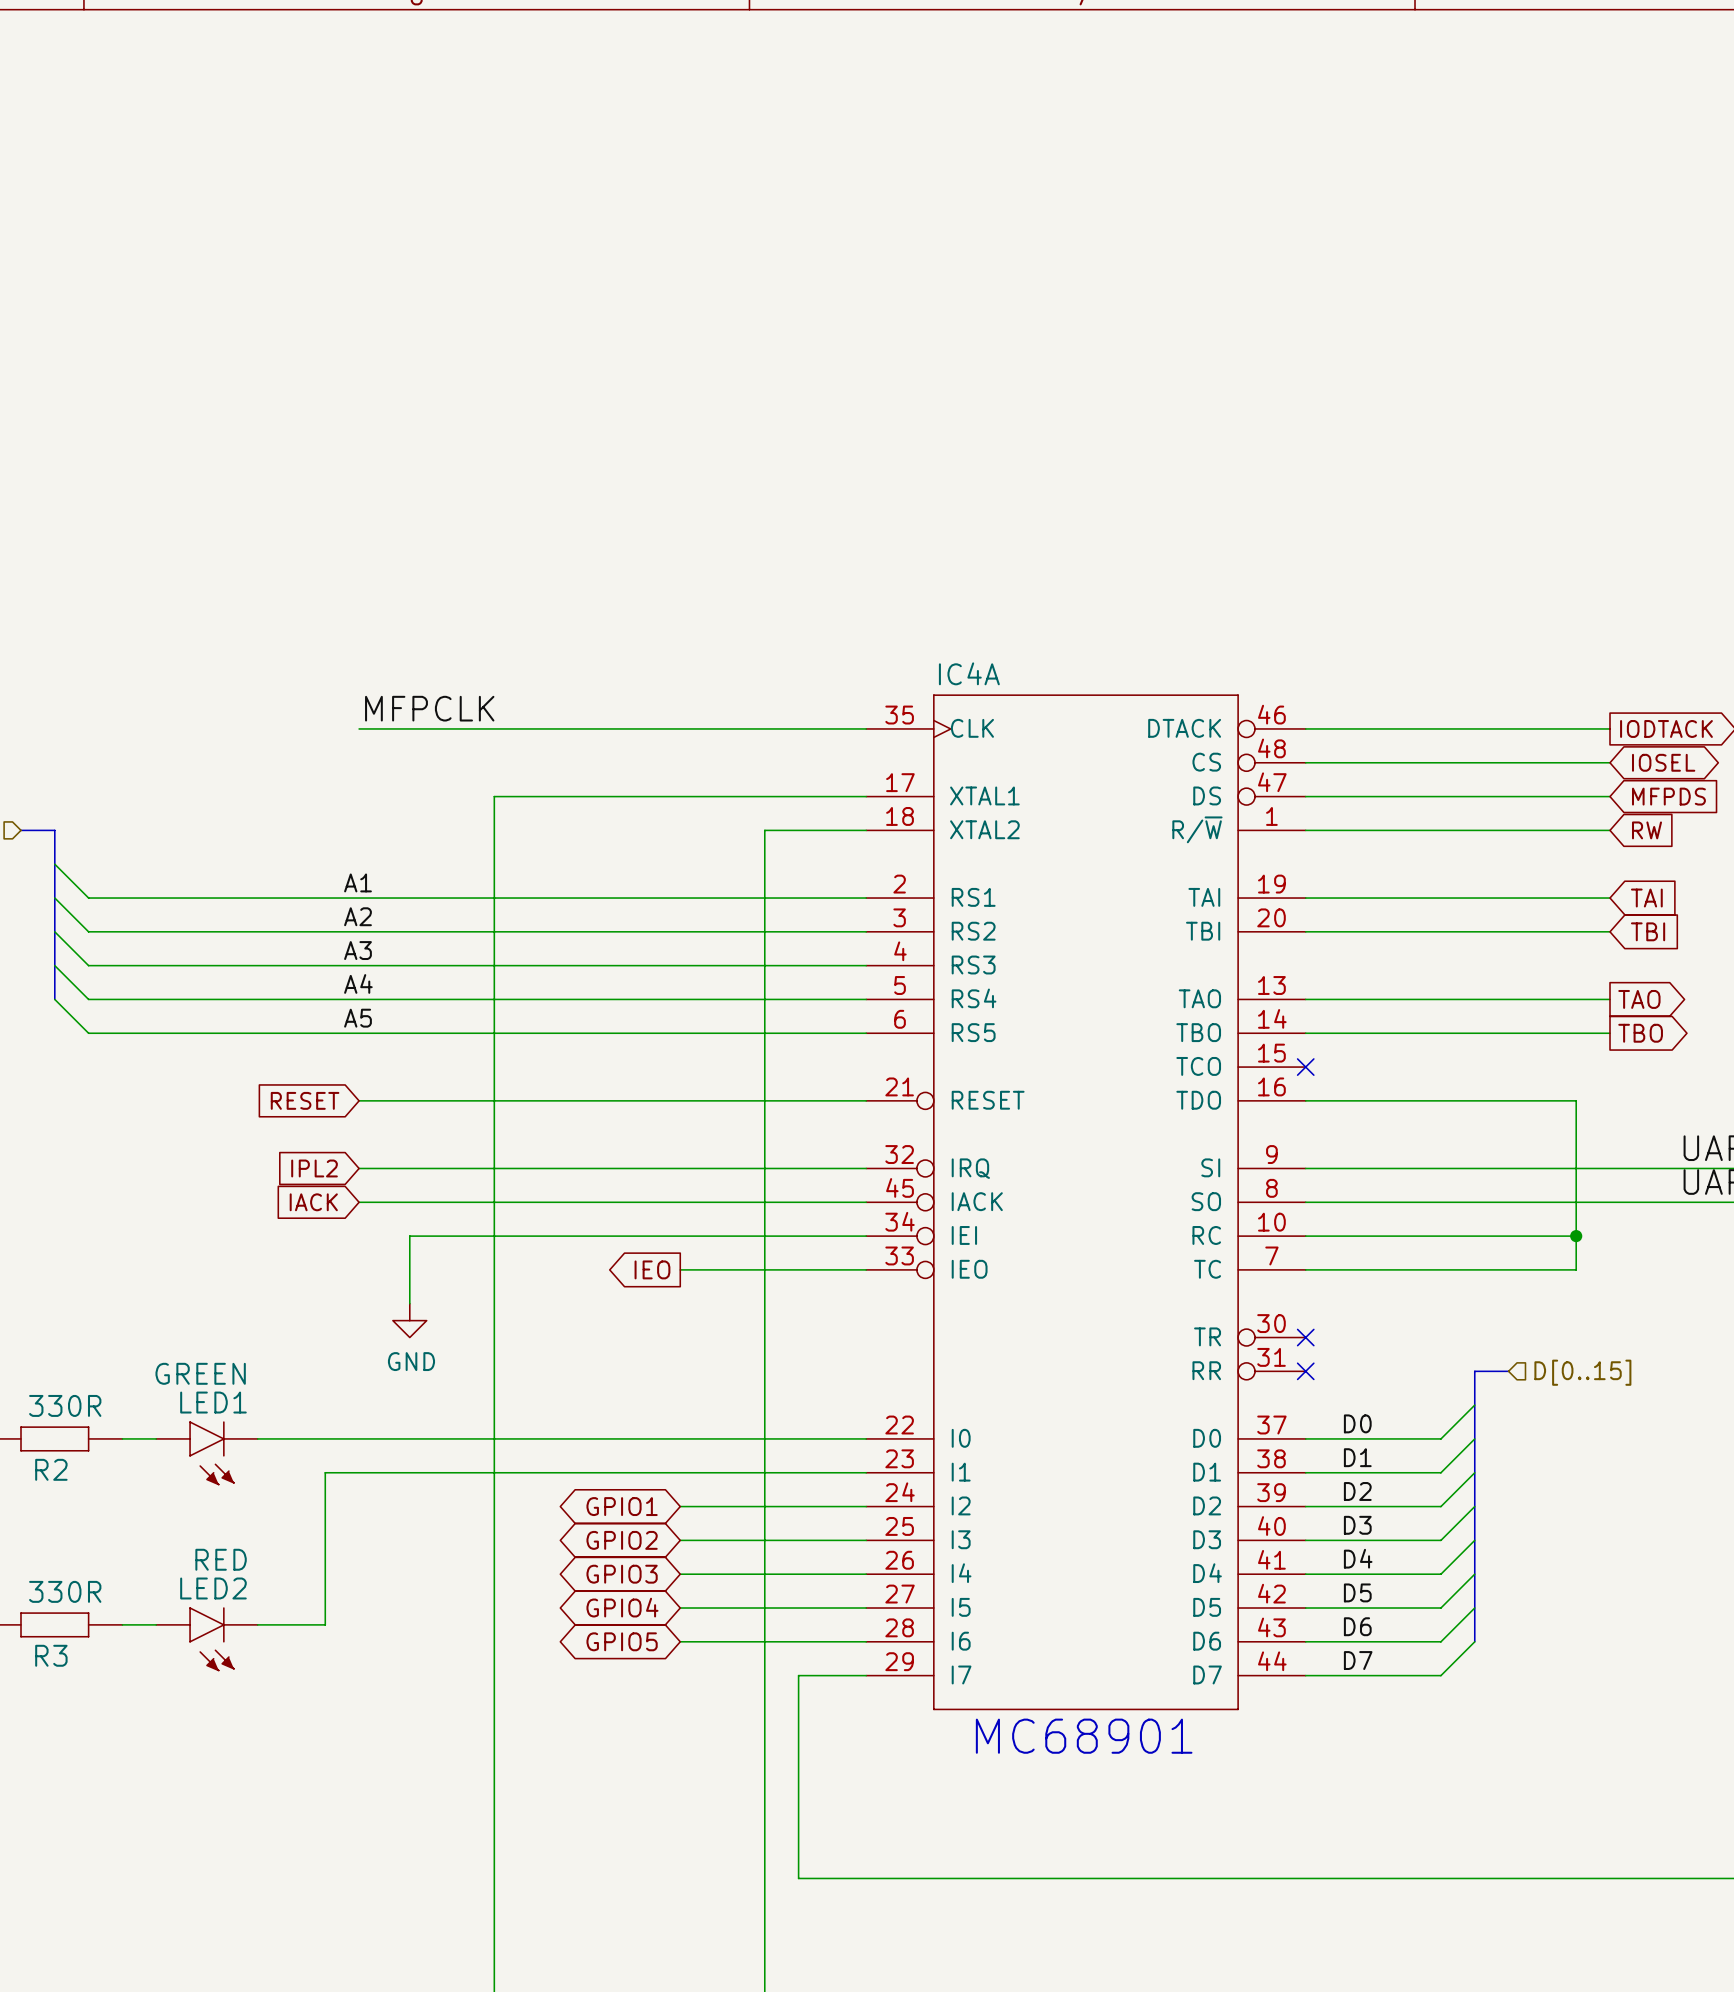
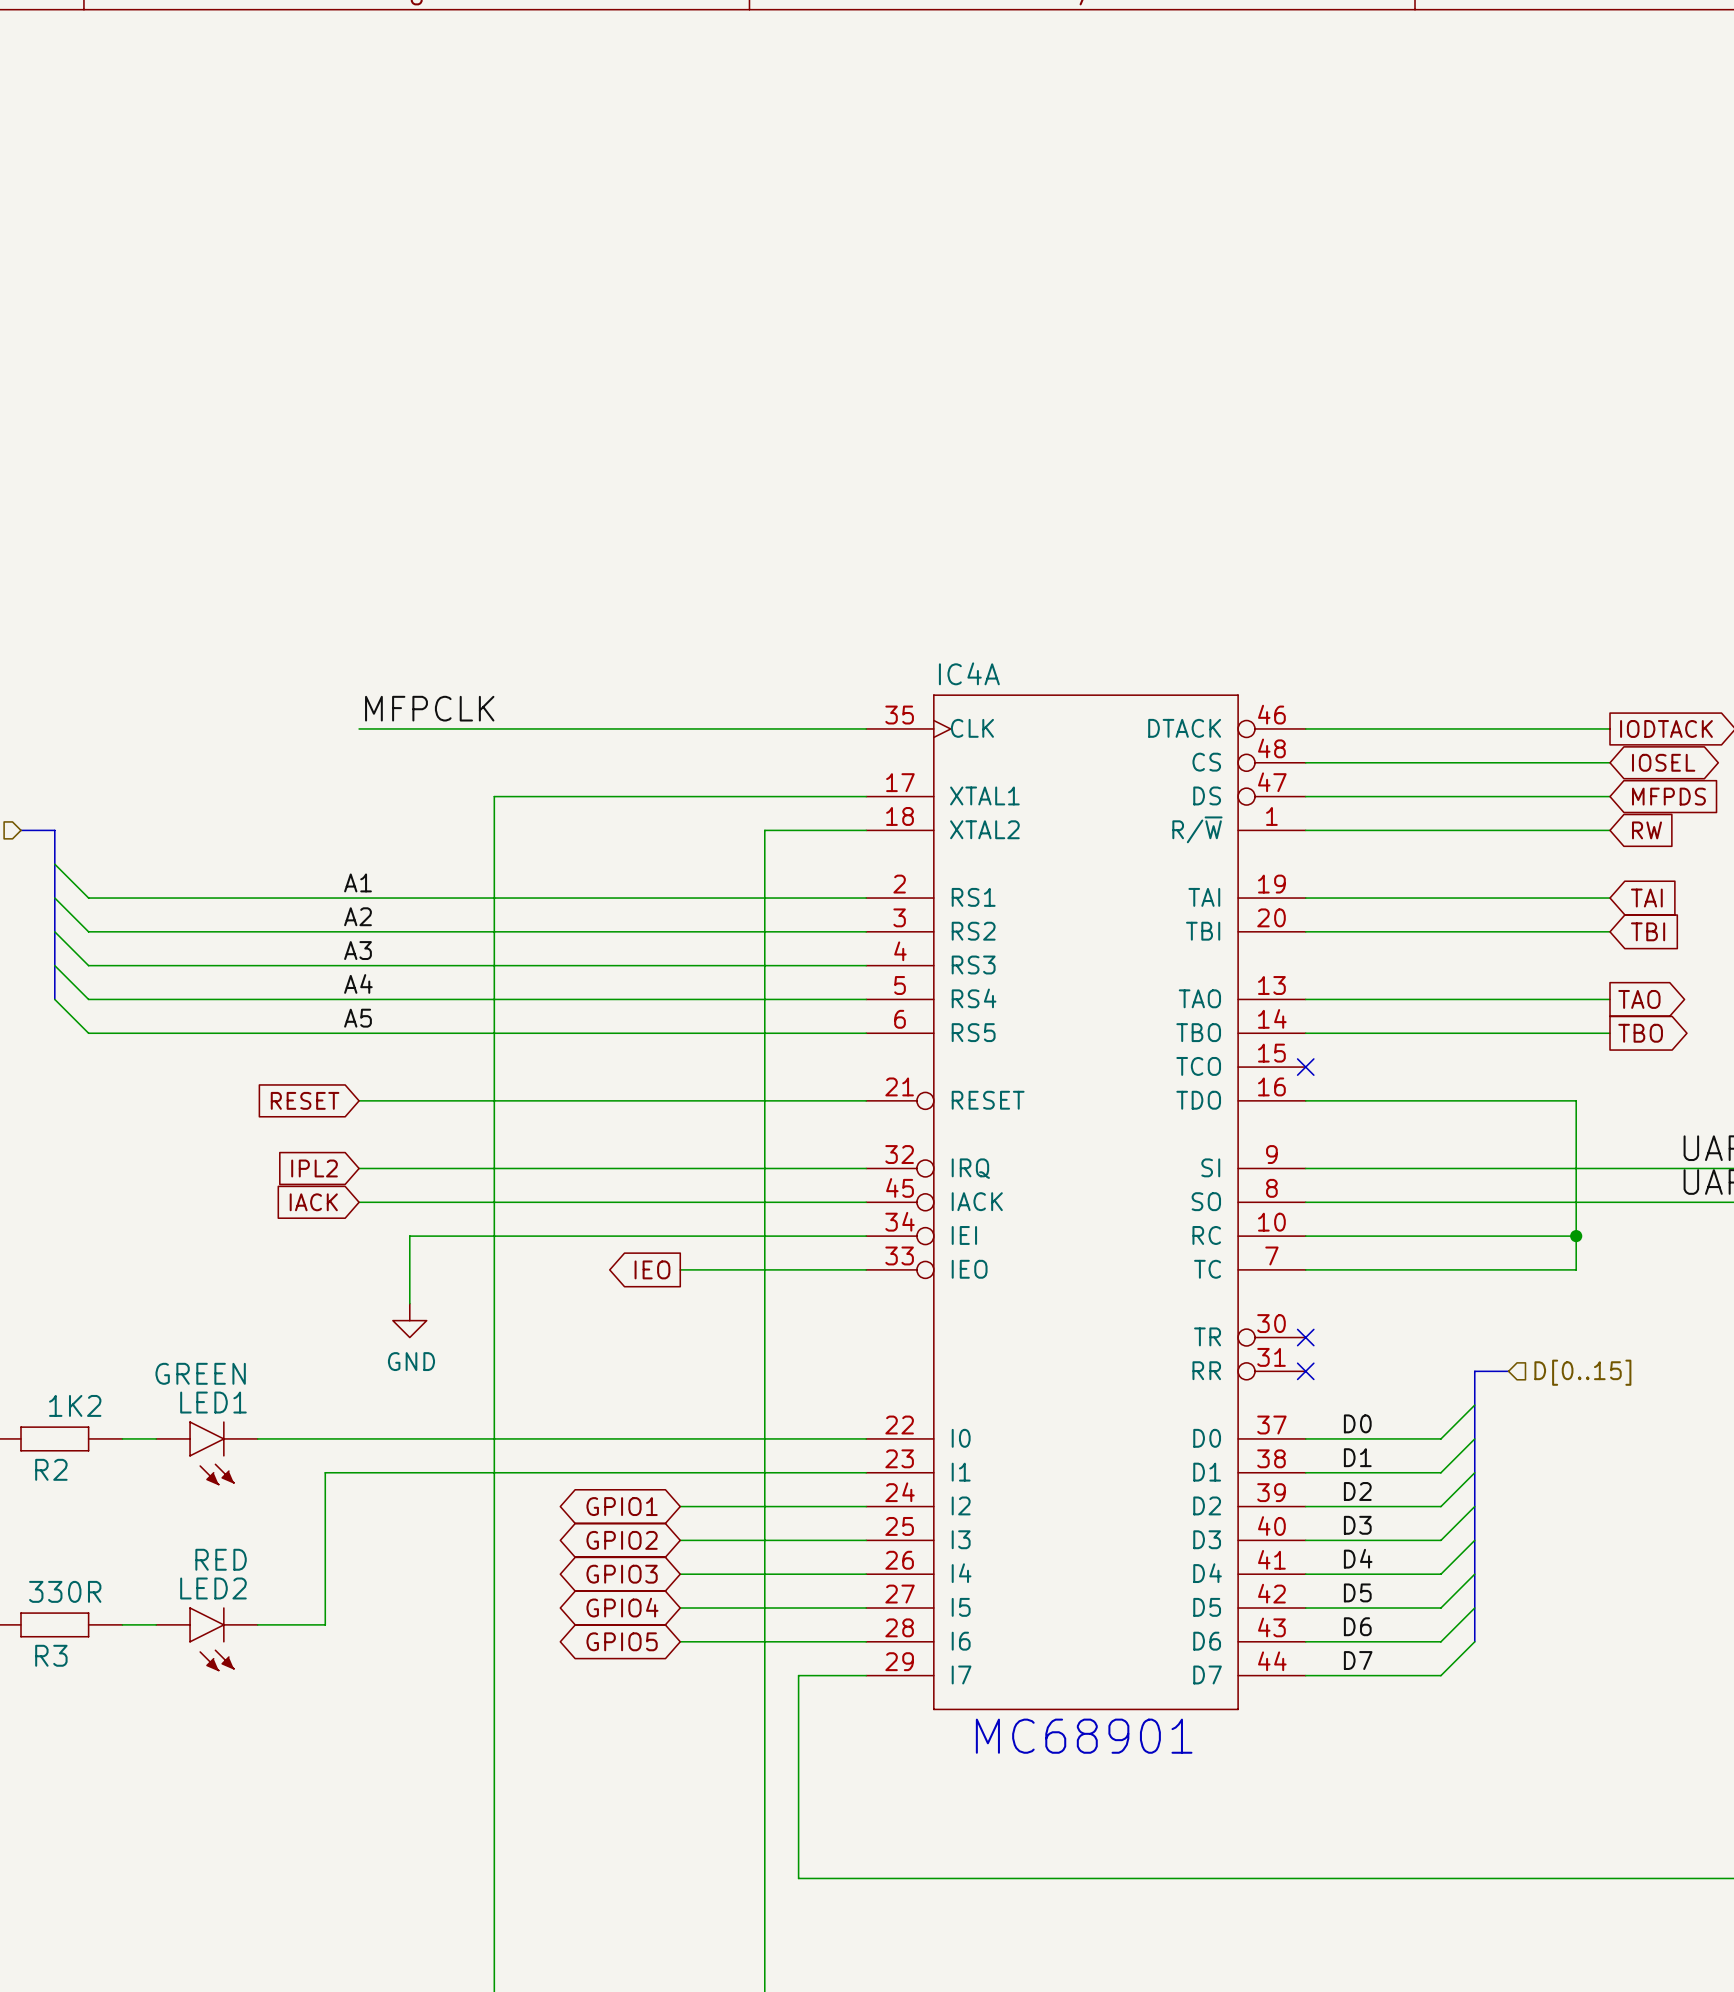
R2 value: 330R (65, 1405) -> 1K2 (75, 1405)

